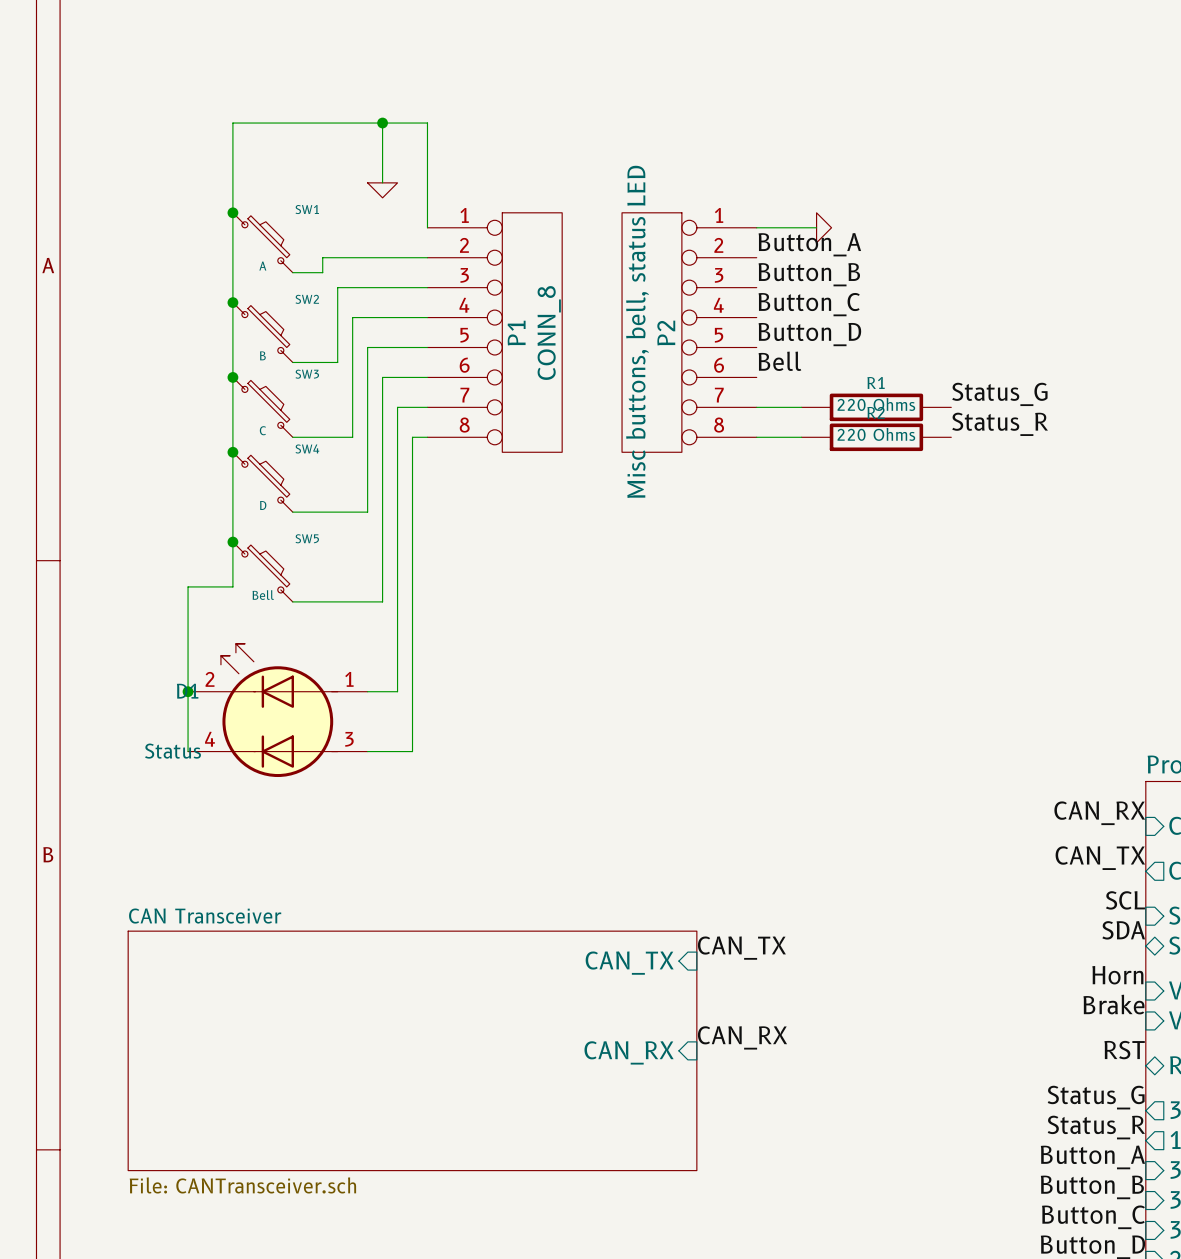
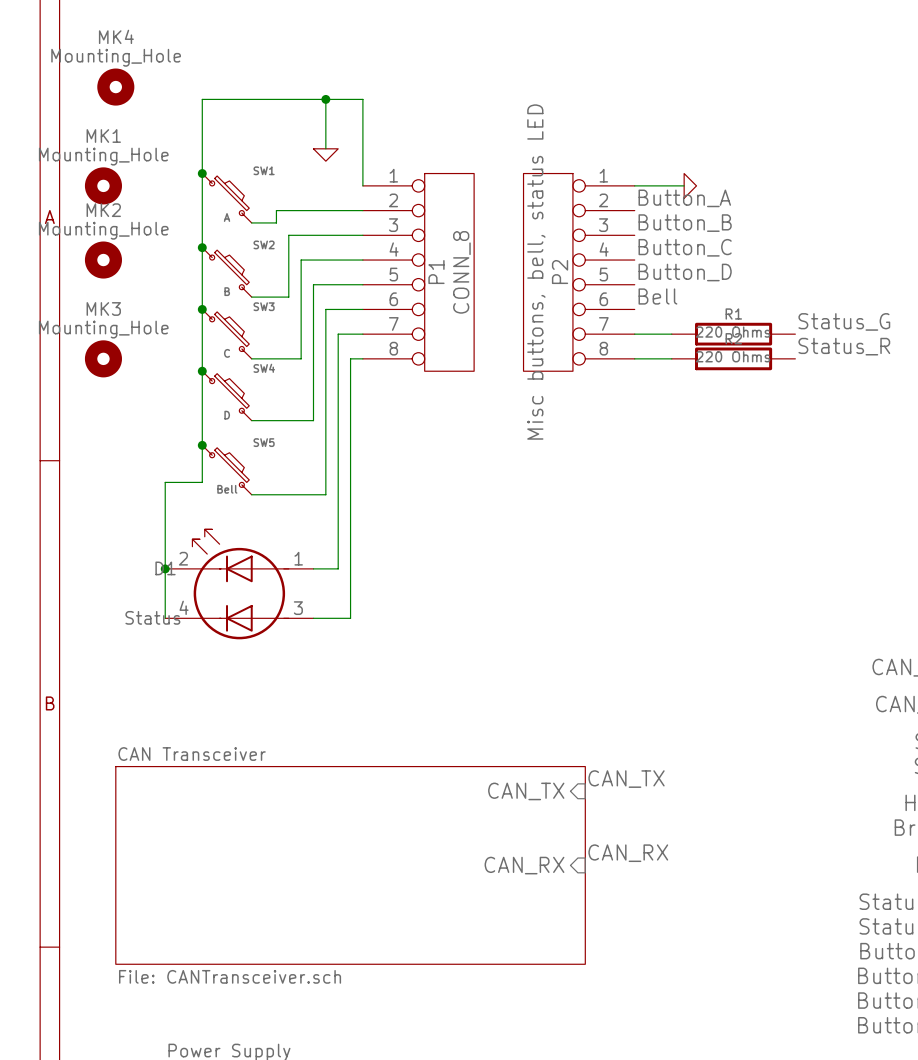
MK4: none -> Mounting_Hole (115, 87)
MK1: none -> Mounting_Hole (103, 185)
MK2: none -> Mounting_Hole (103, 260)
MK3: none -> Mounting_Hole (103, 358)

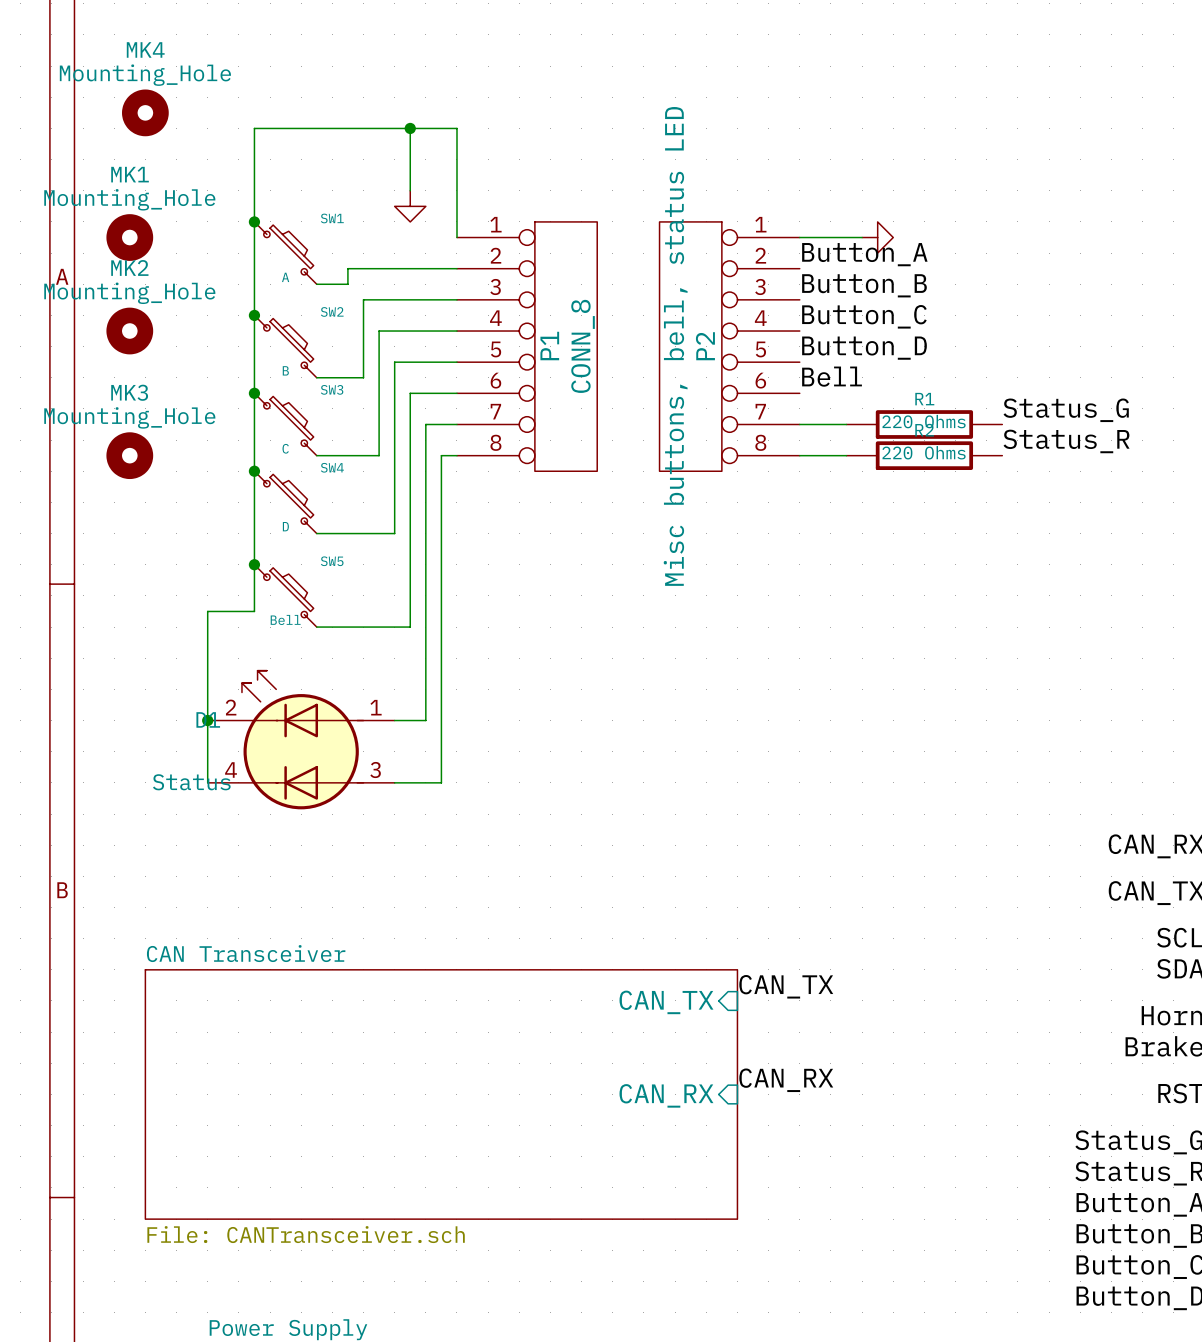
power symbol shape: [313, 148, 339, 162] -> [394, 190, 426, 222]
power symbol shape: [684, 173, 697, 199] -> [862, 221, 894, 254]

